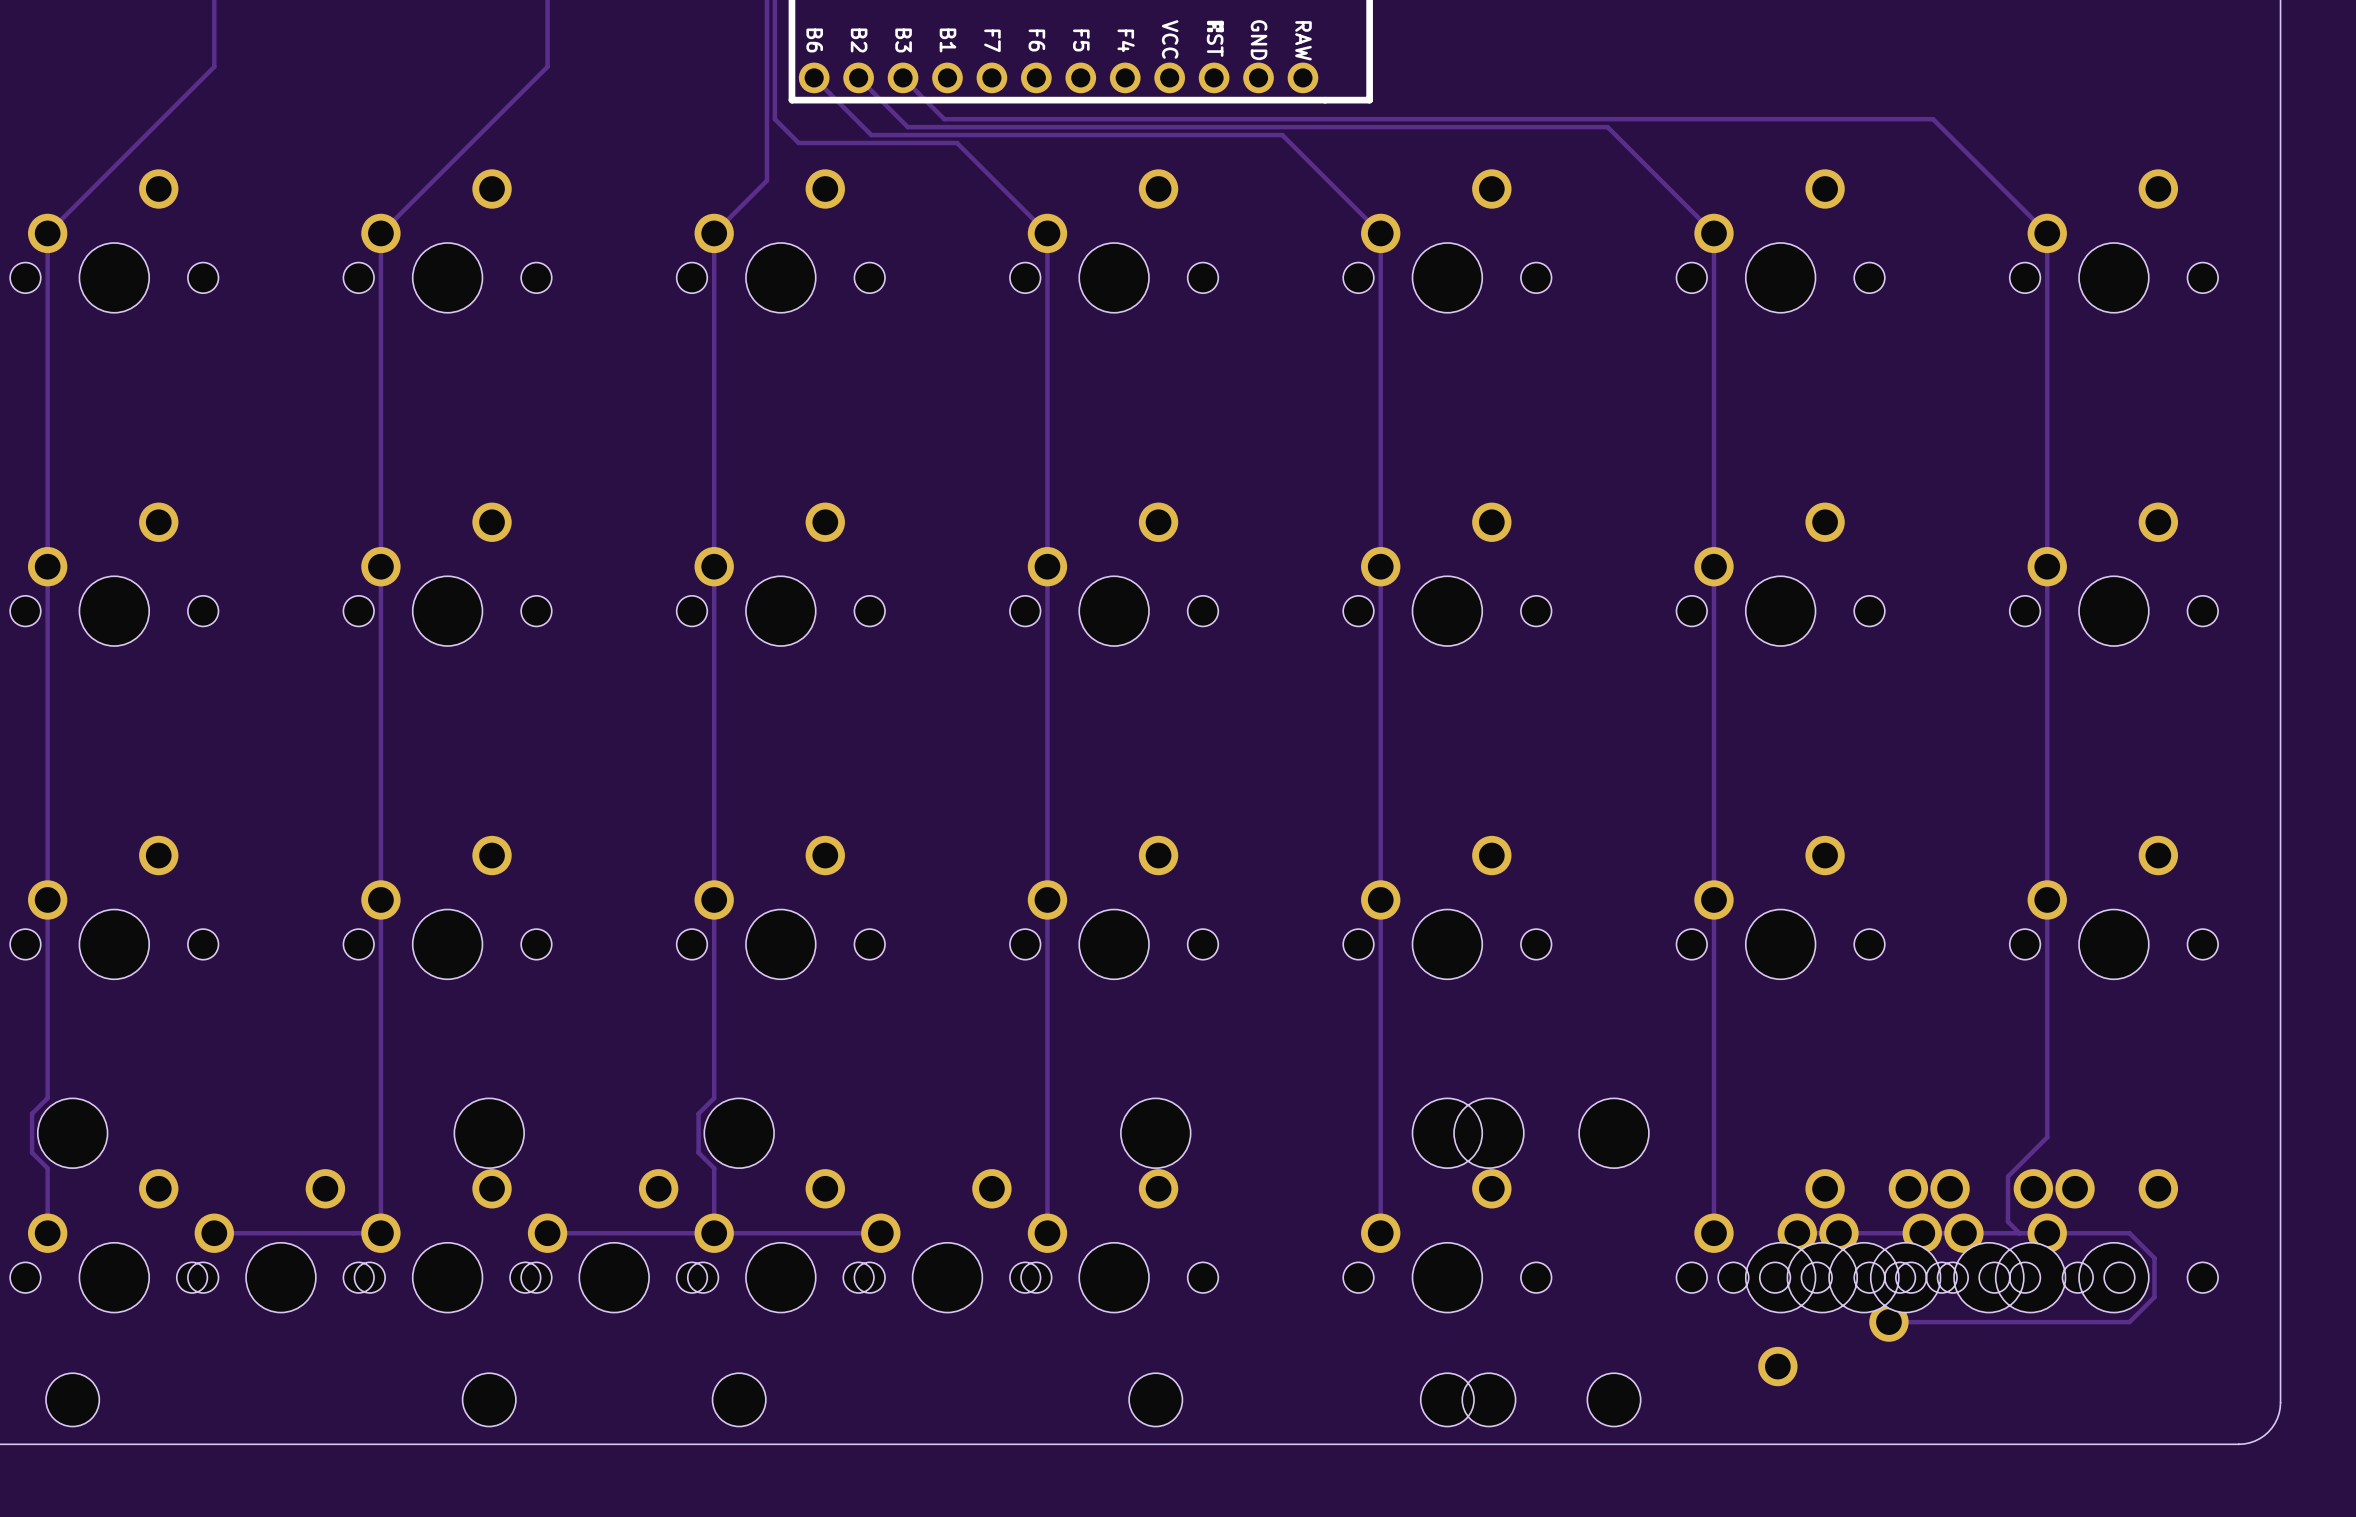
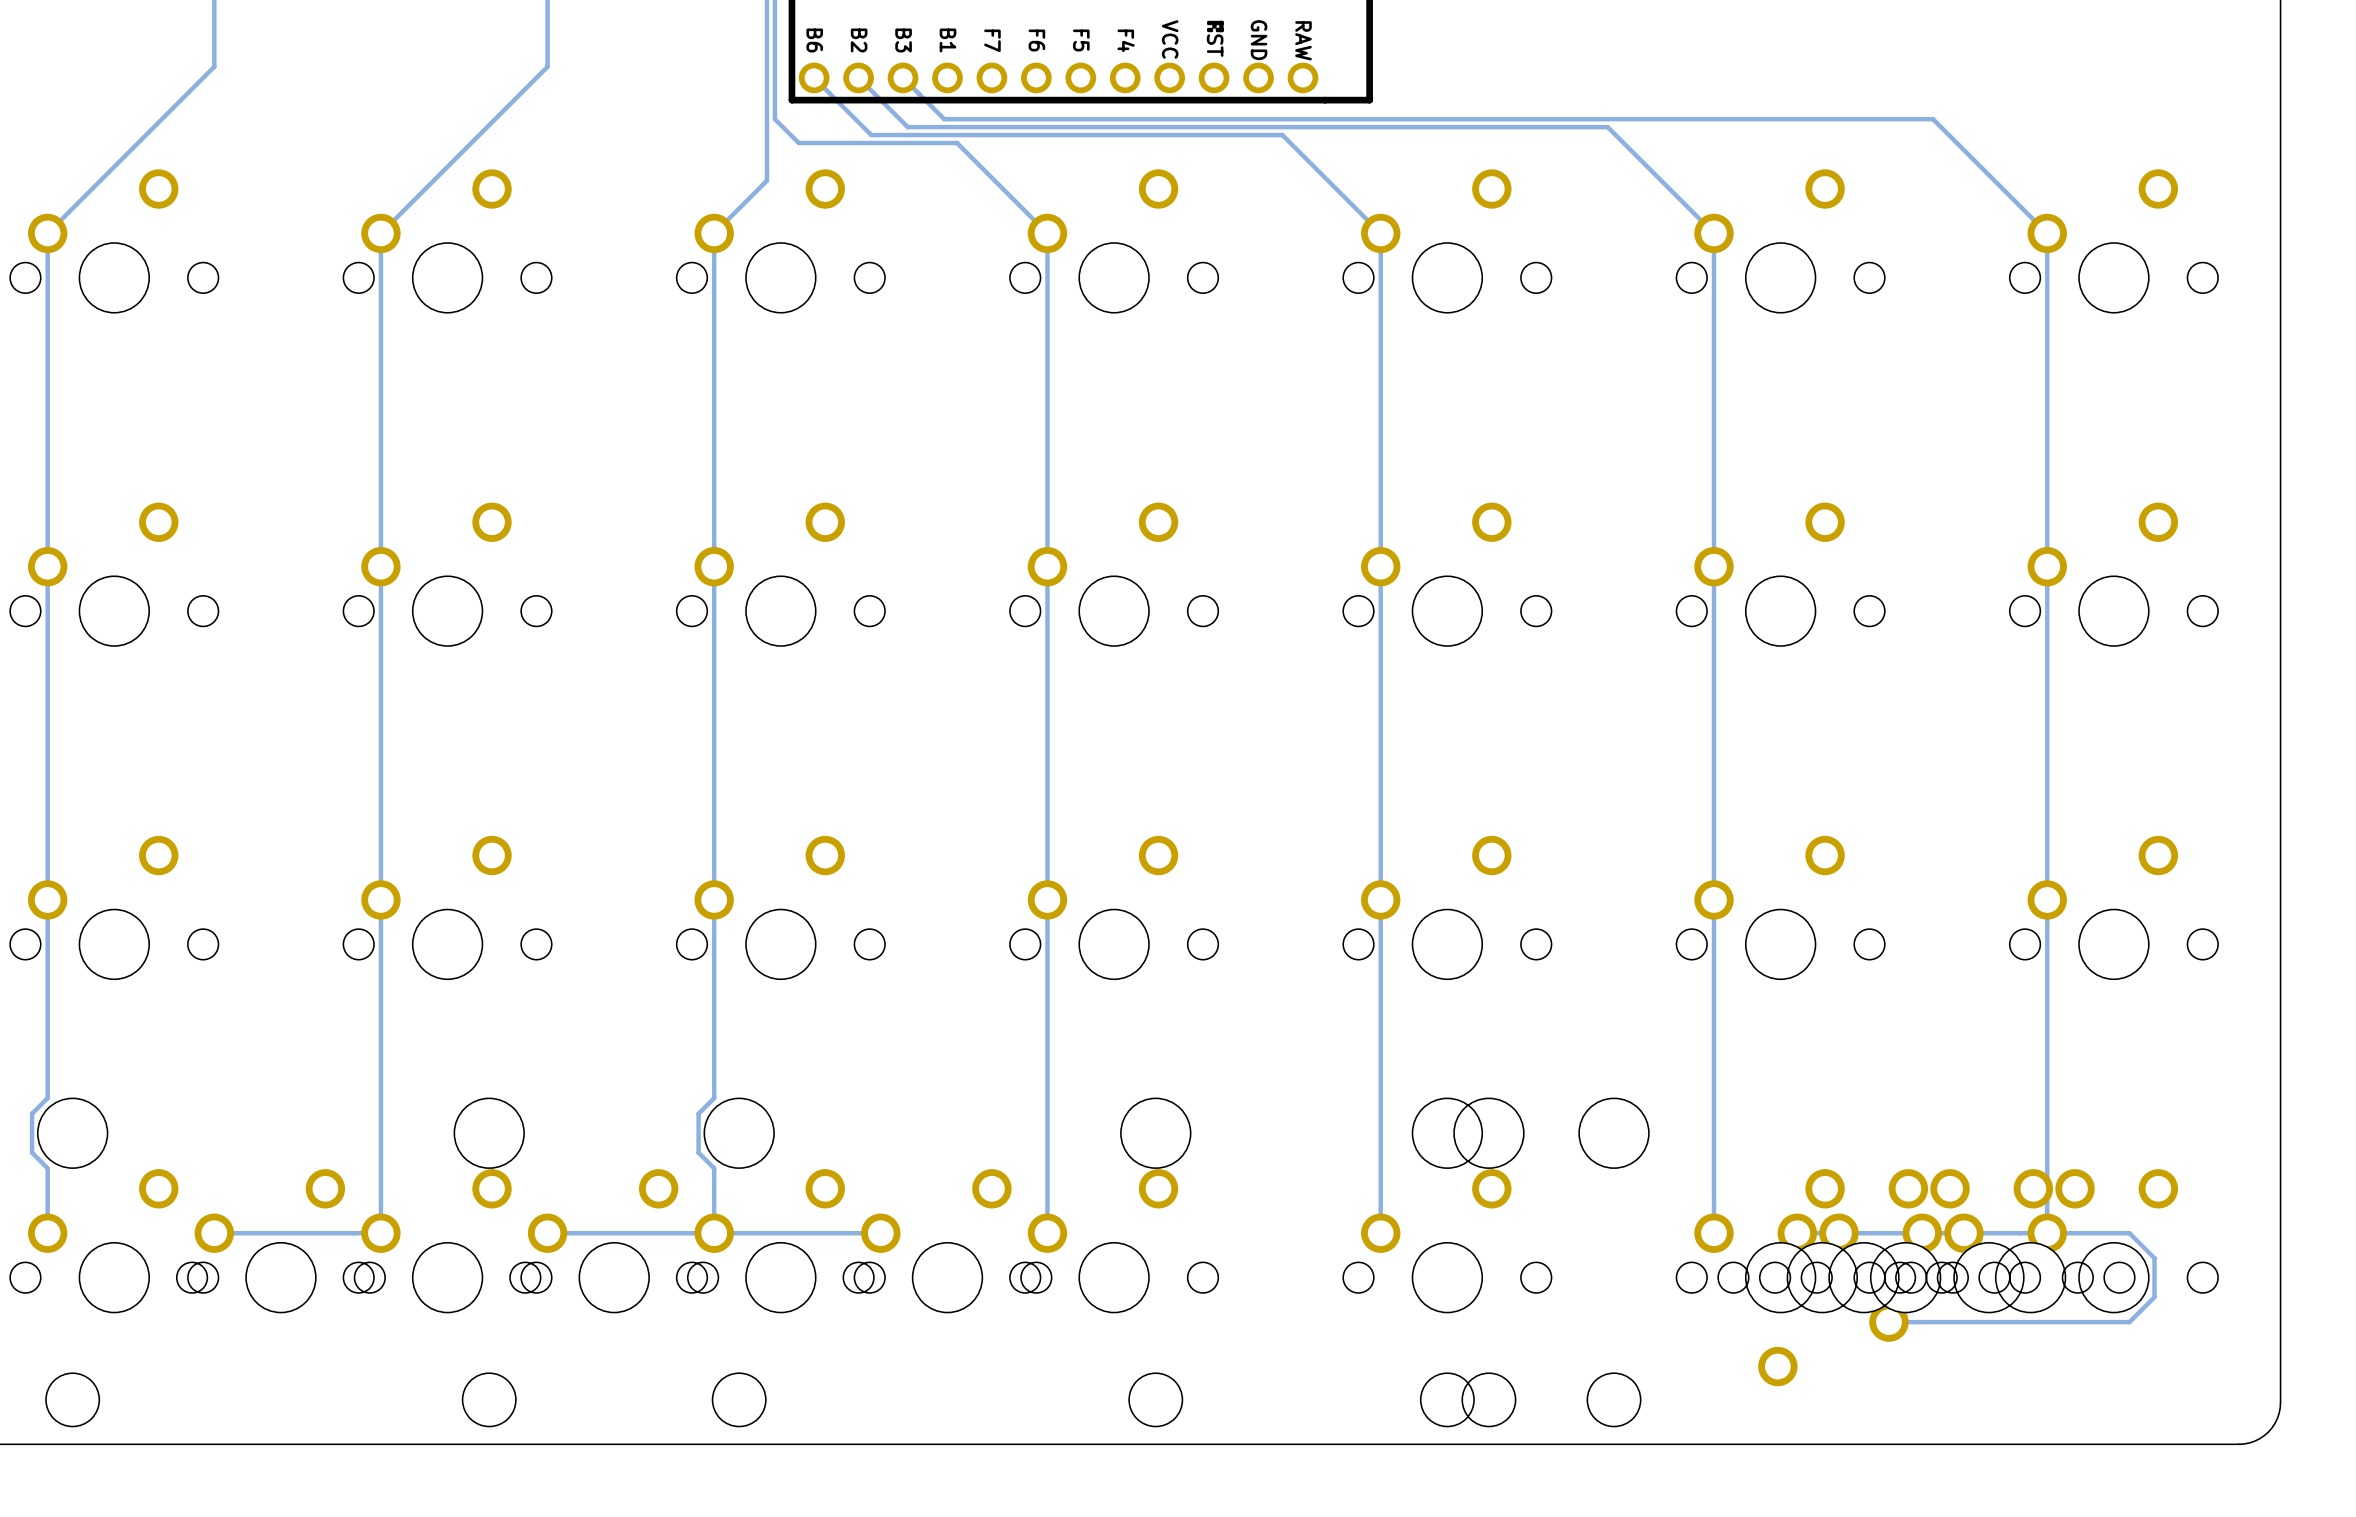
track: (2047, 1137) (2007, 1176) (2007, 1221) (2019, 1233) -> (2047, 1137) (2047, 1233)

